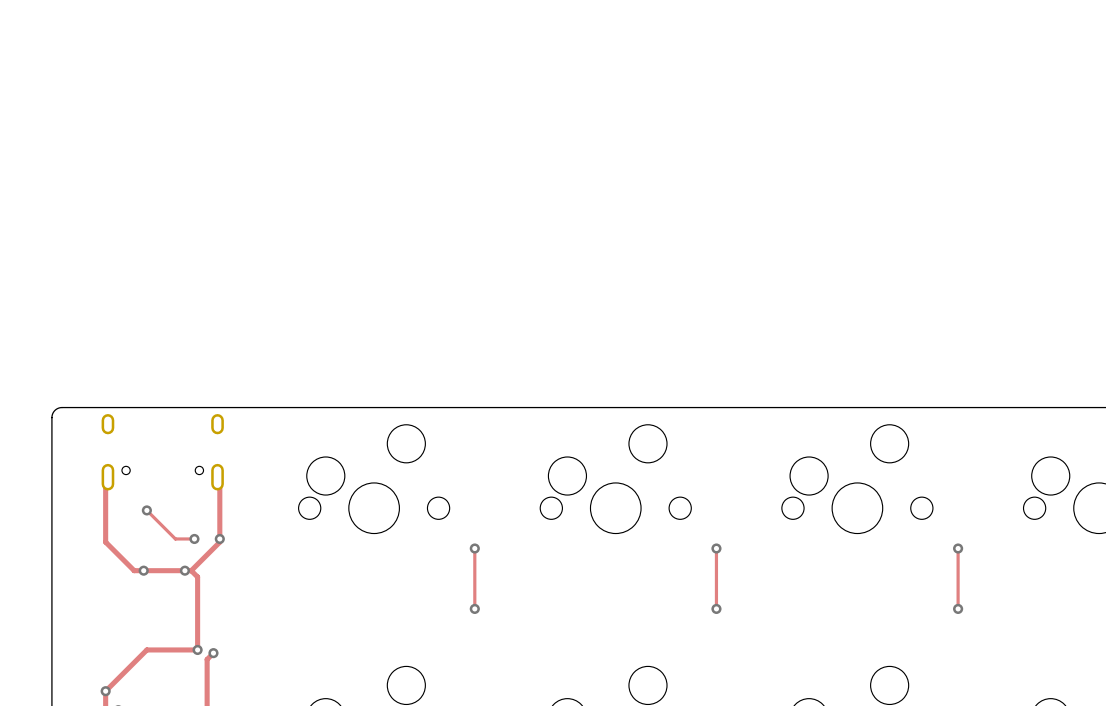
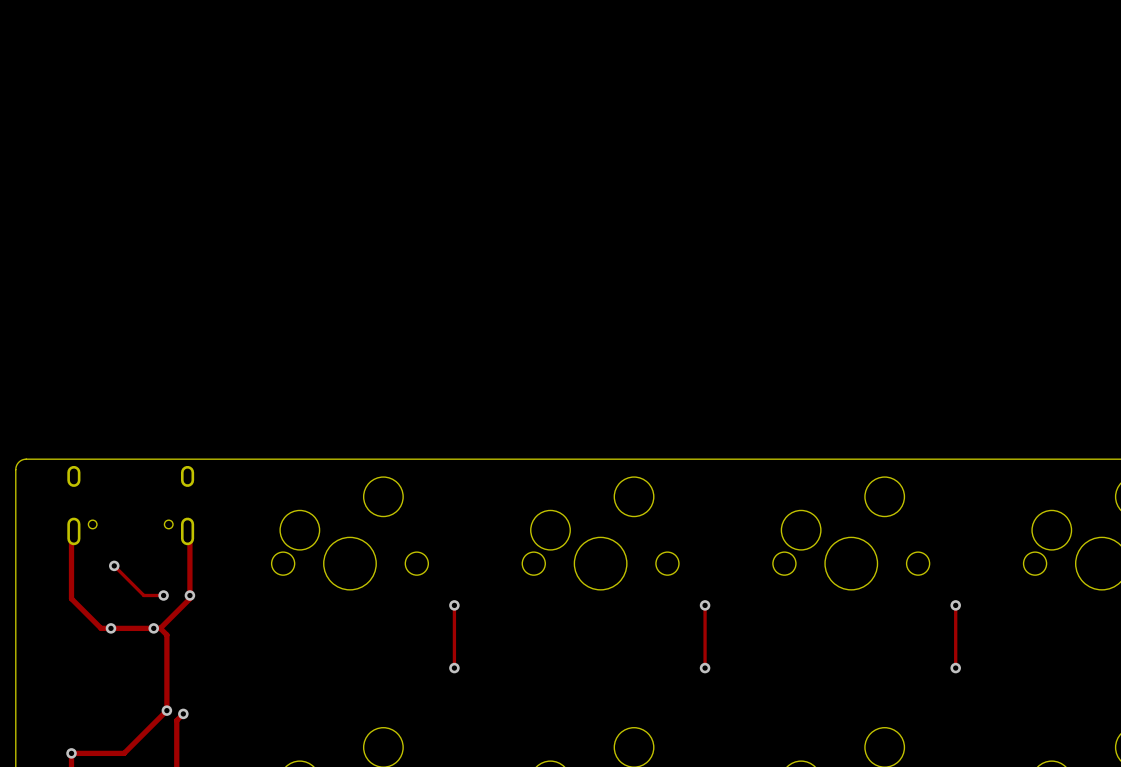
track: (197, 649) (146, 649) (105, 691) -> (166, 710) (124, 753) (71, 753)

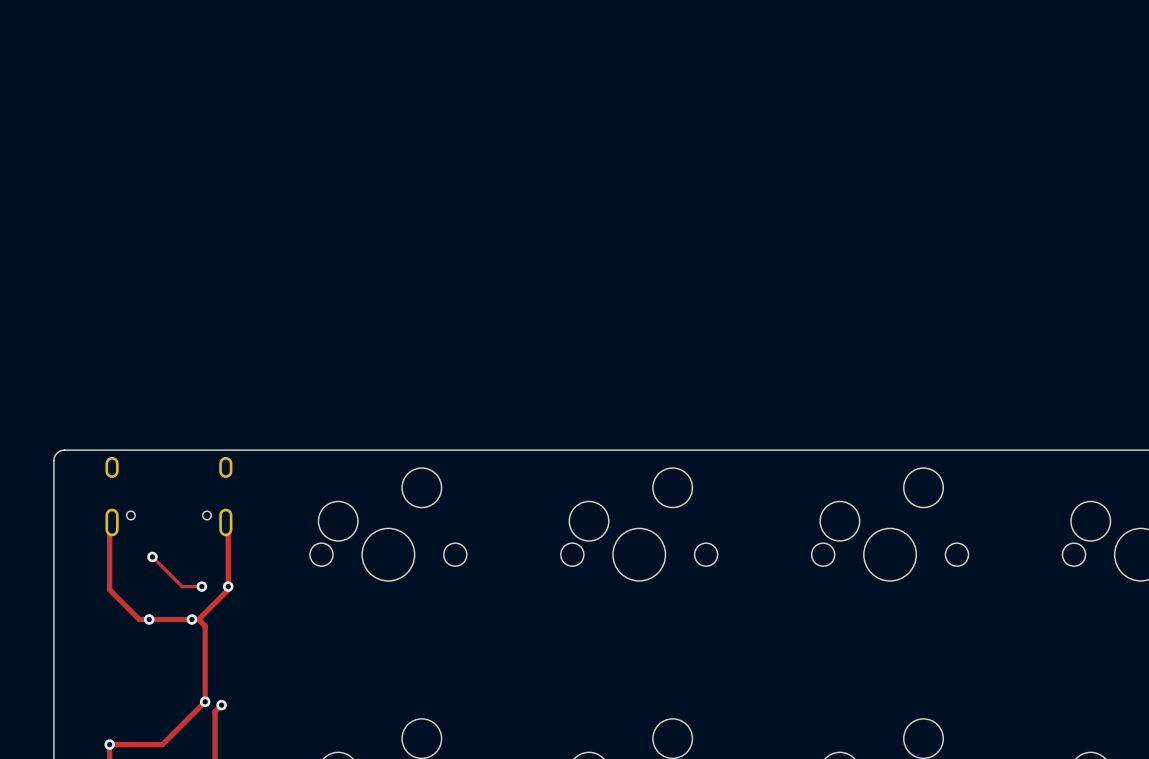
track: (454, 605) (454, 668) -> none
via: (454, 605) -> none
track: (705, 605) (705, 668) -> none
via: (705, 605) -> none
track: (955, 605) (955, 668) -> none
via: (955, 605) -> none
via: (454, 668) -> none
via: (705, 668) -> none
via: (955, 668) -> none

